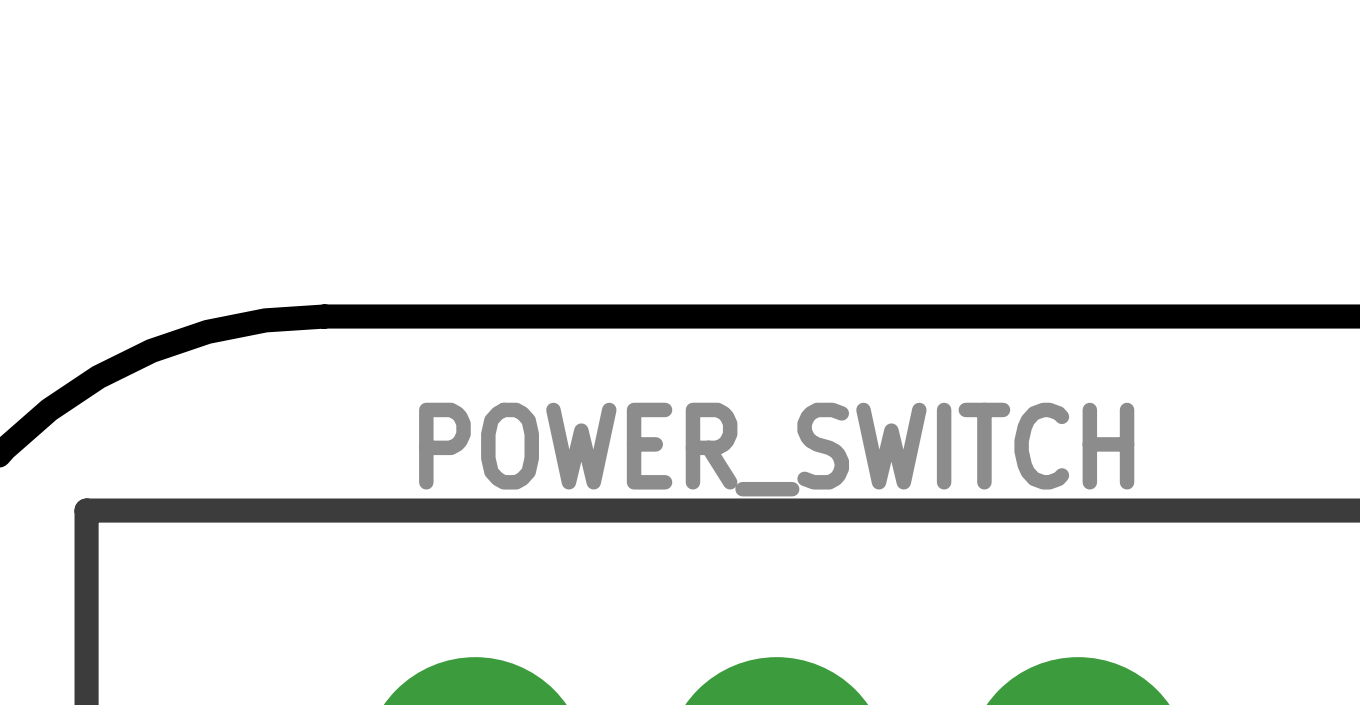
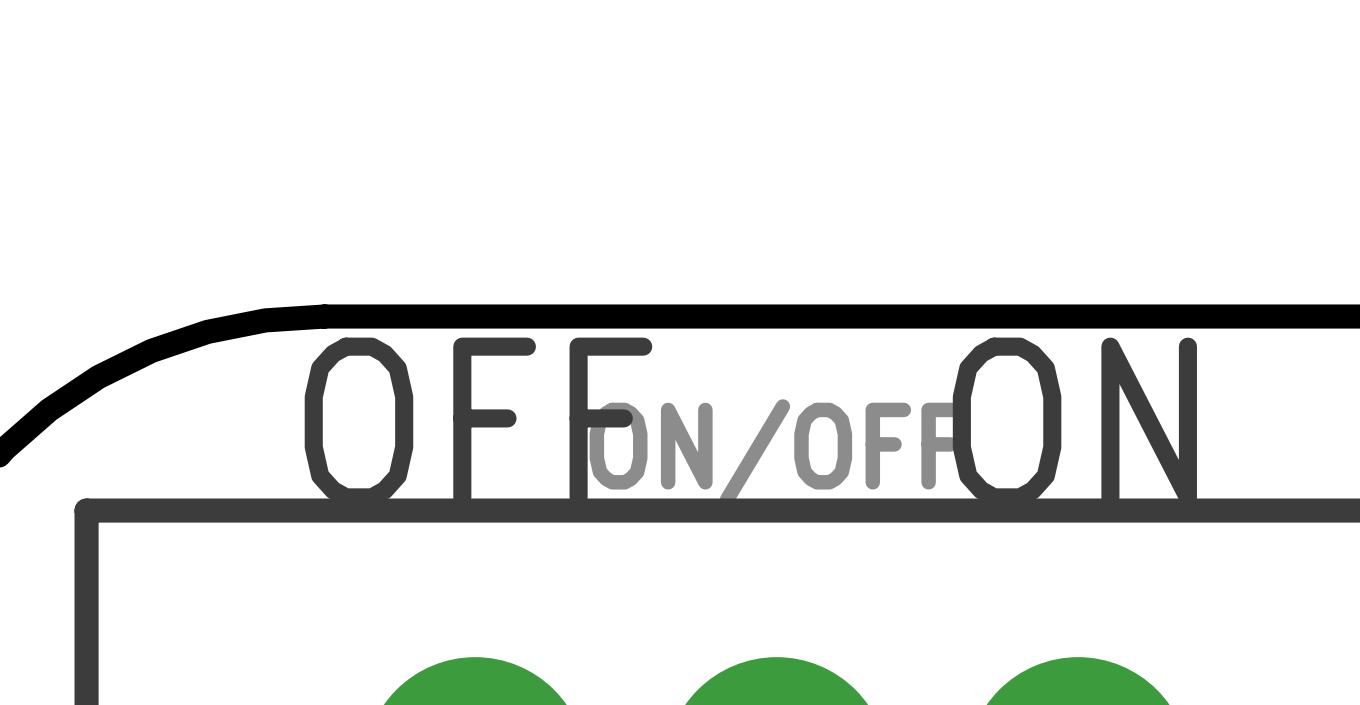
text: none -> OFF (478, 422)
text: none -> ON (1074, 422)
part value: POWER_SWITCH (776, 449) -> ON/OFF (778, 453)

